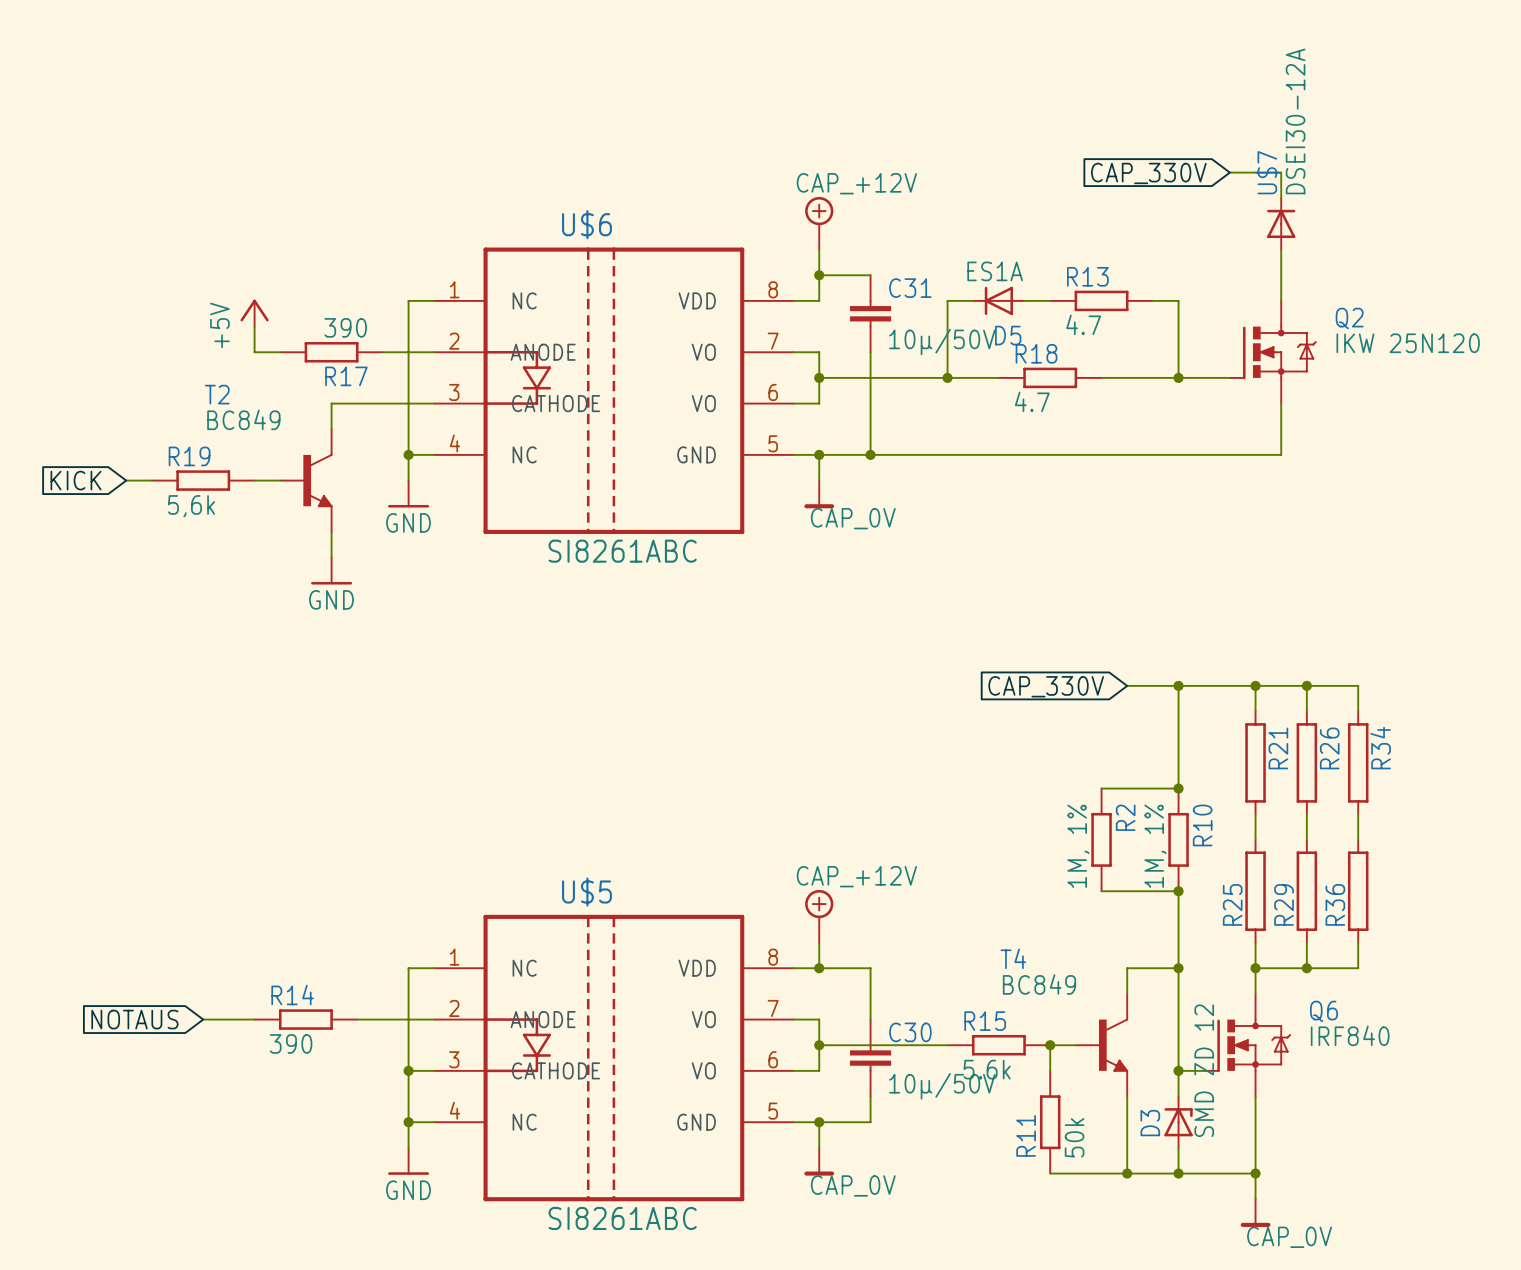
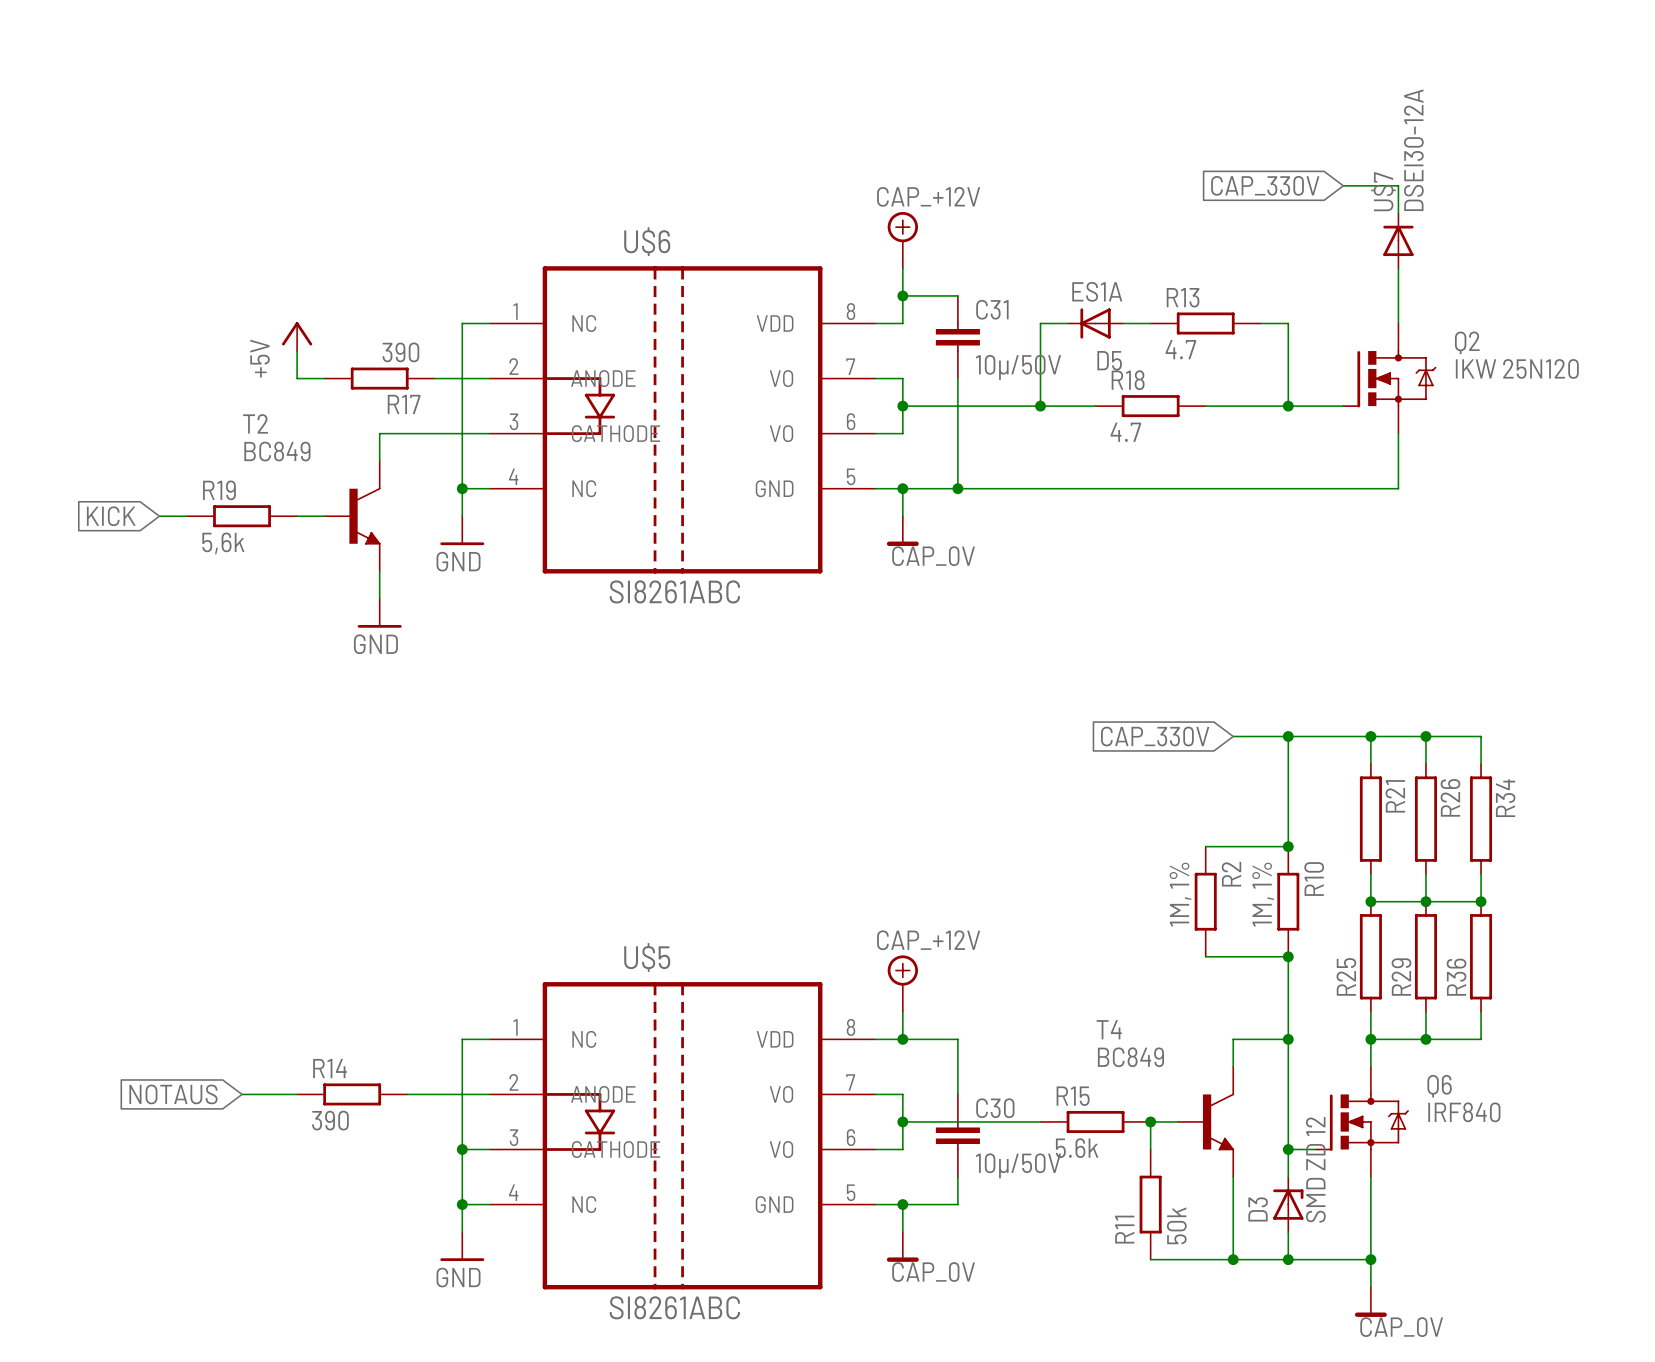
wire: none -> (1370, 901) (1481, 901)
junction: none -> (1370, 901)
junction: none -> (1425, 901)
junction: none -> (1481, 901)

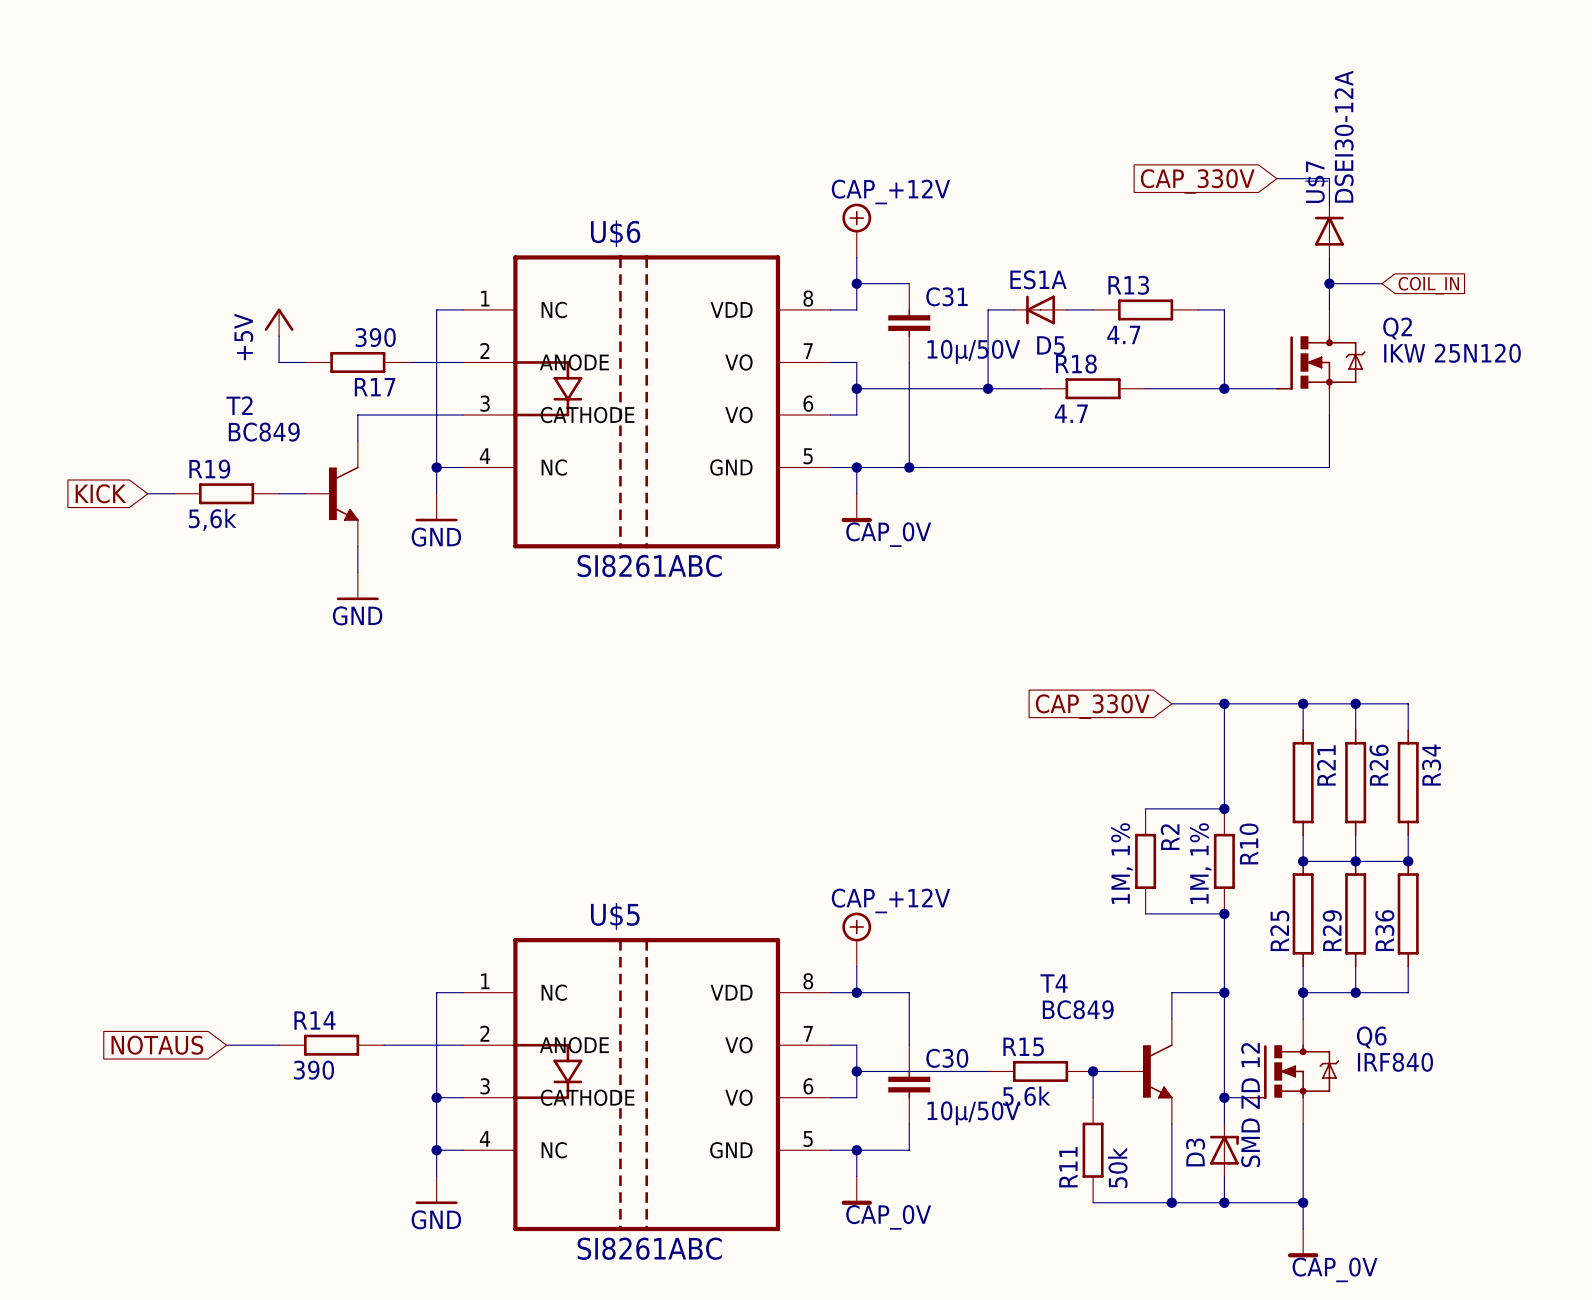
wire: none -> (1329, 283) (1381, 283)
junction: none -> (1329, 283)
global label: none -> COIL_IN (1428, 285)

